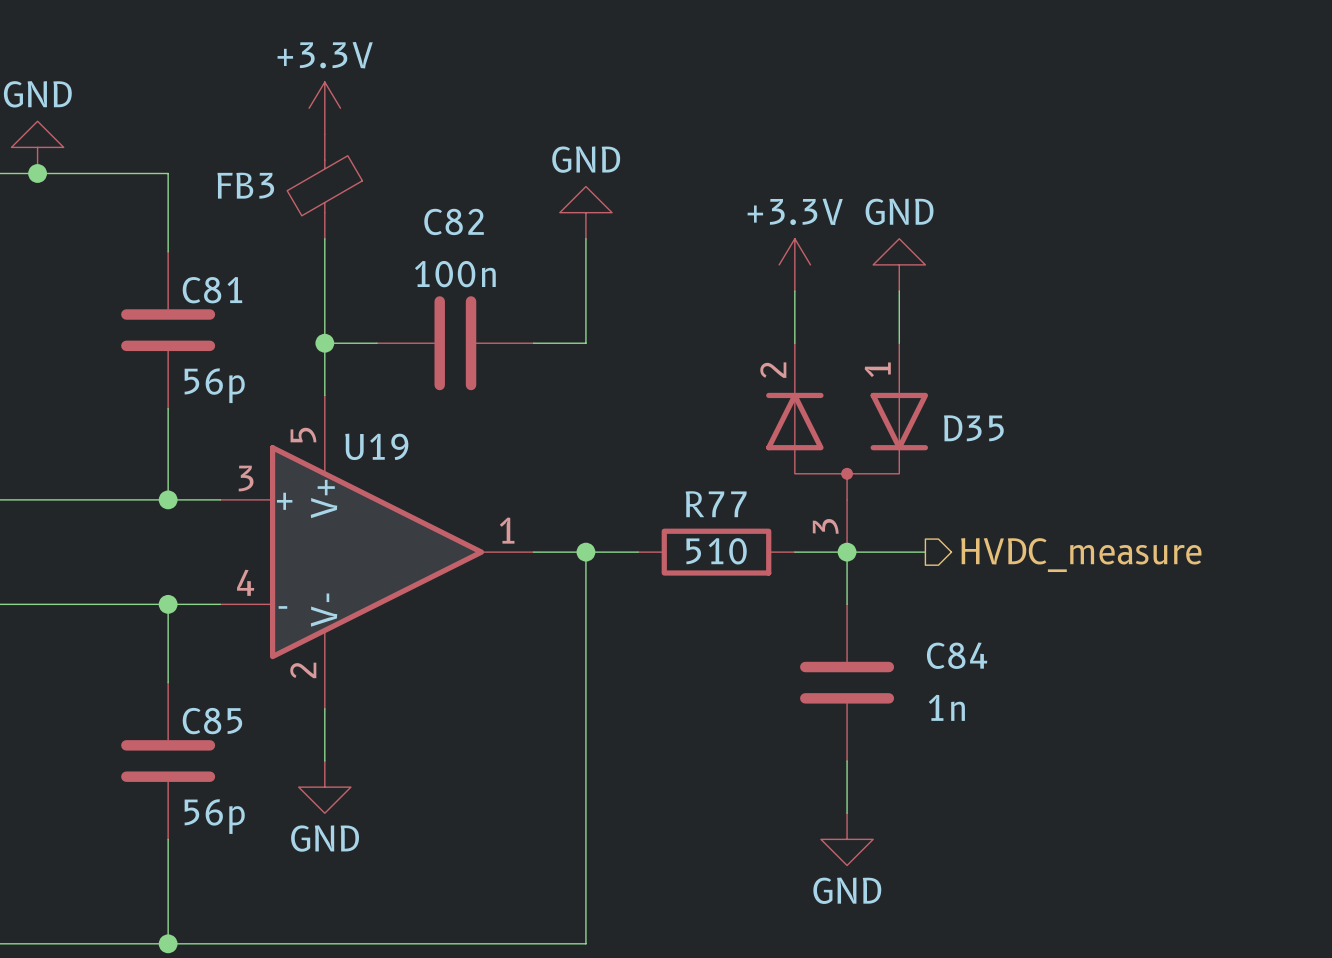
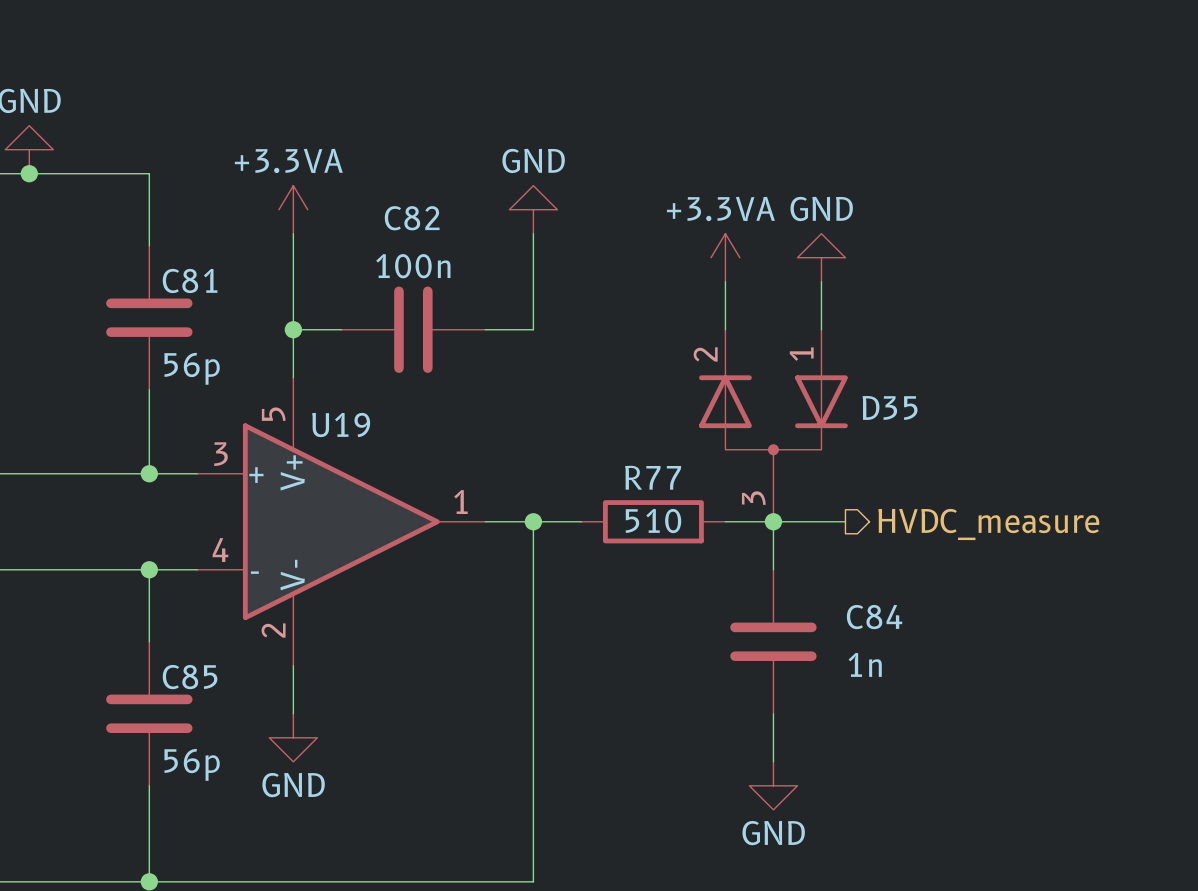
power symbol: +3.3V (324, 108) -> none
FB3: (324, 186) -> none
power symbol: none -> +3.3VA (293, 209)
power symbol: +3.3V (794, 264) -> +3.3VA (725, 257)

